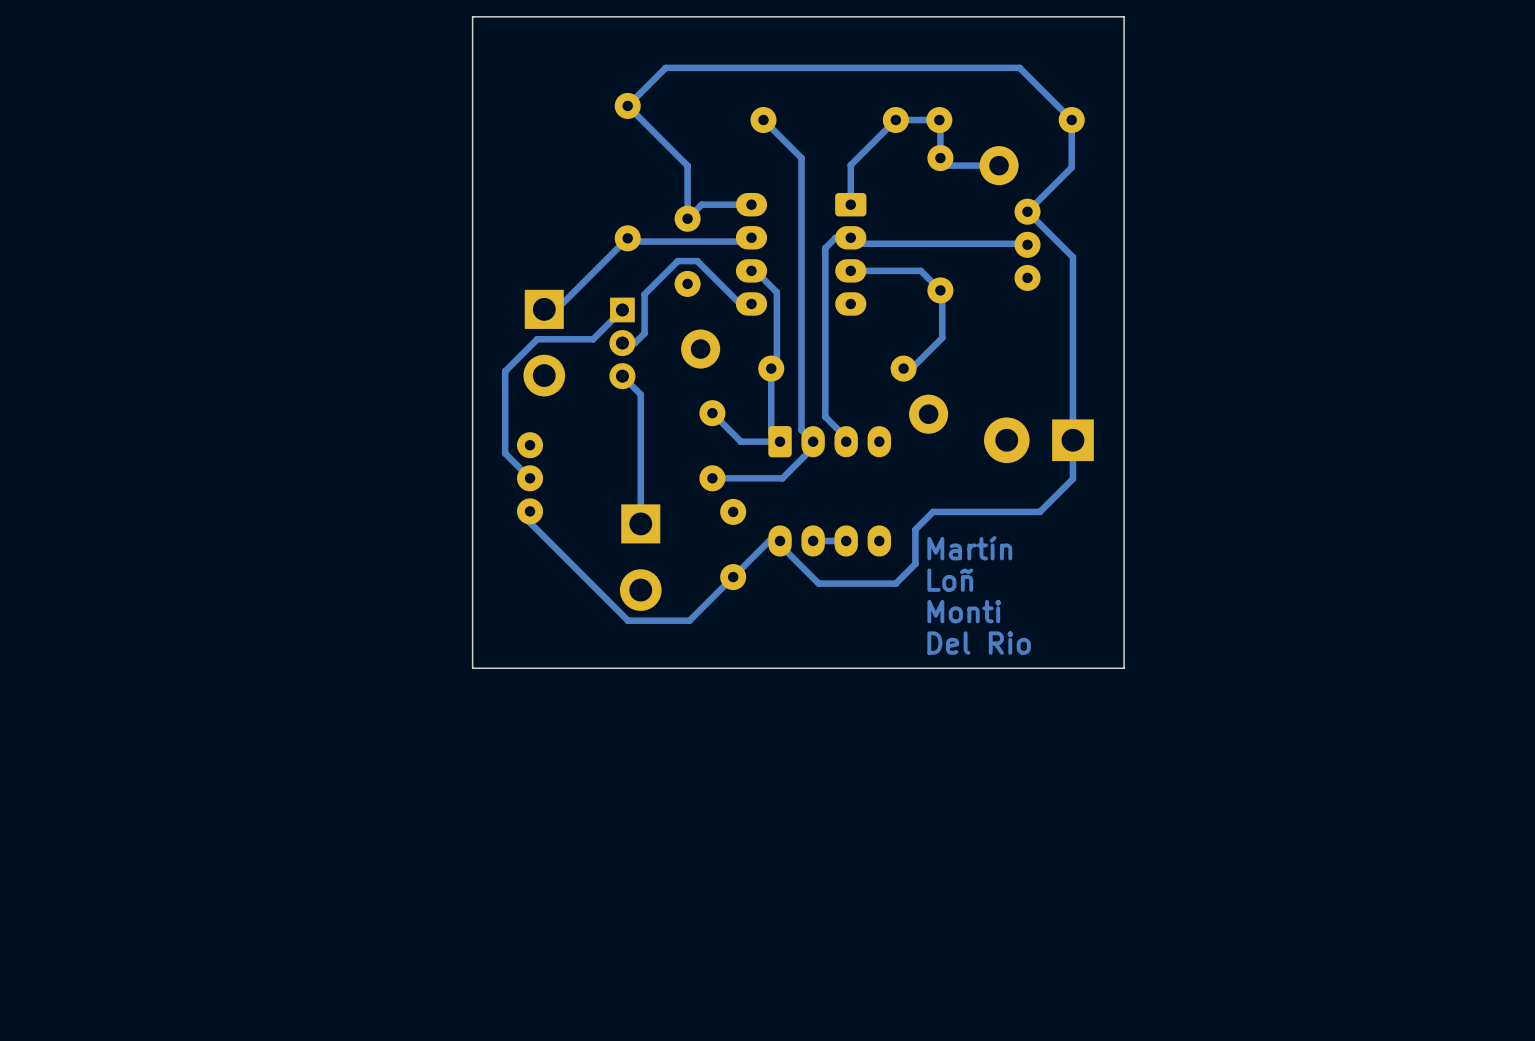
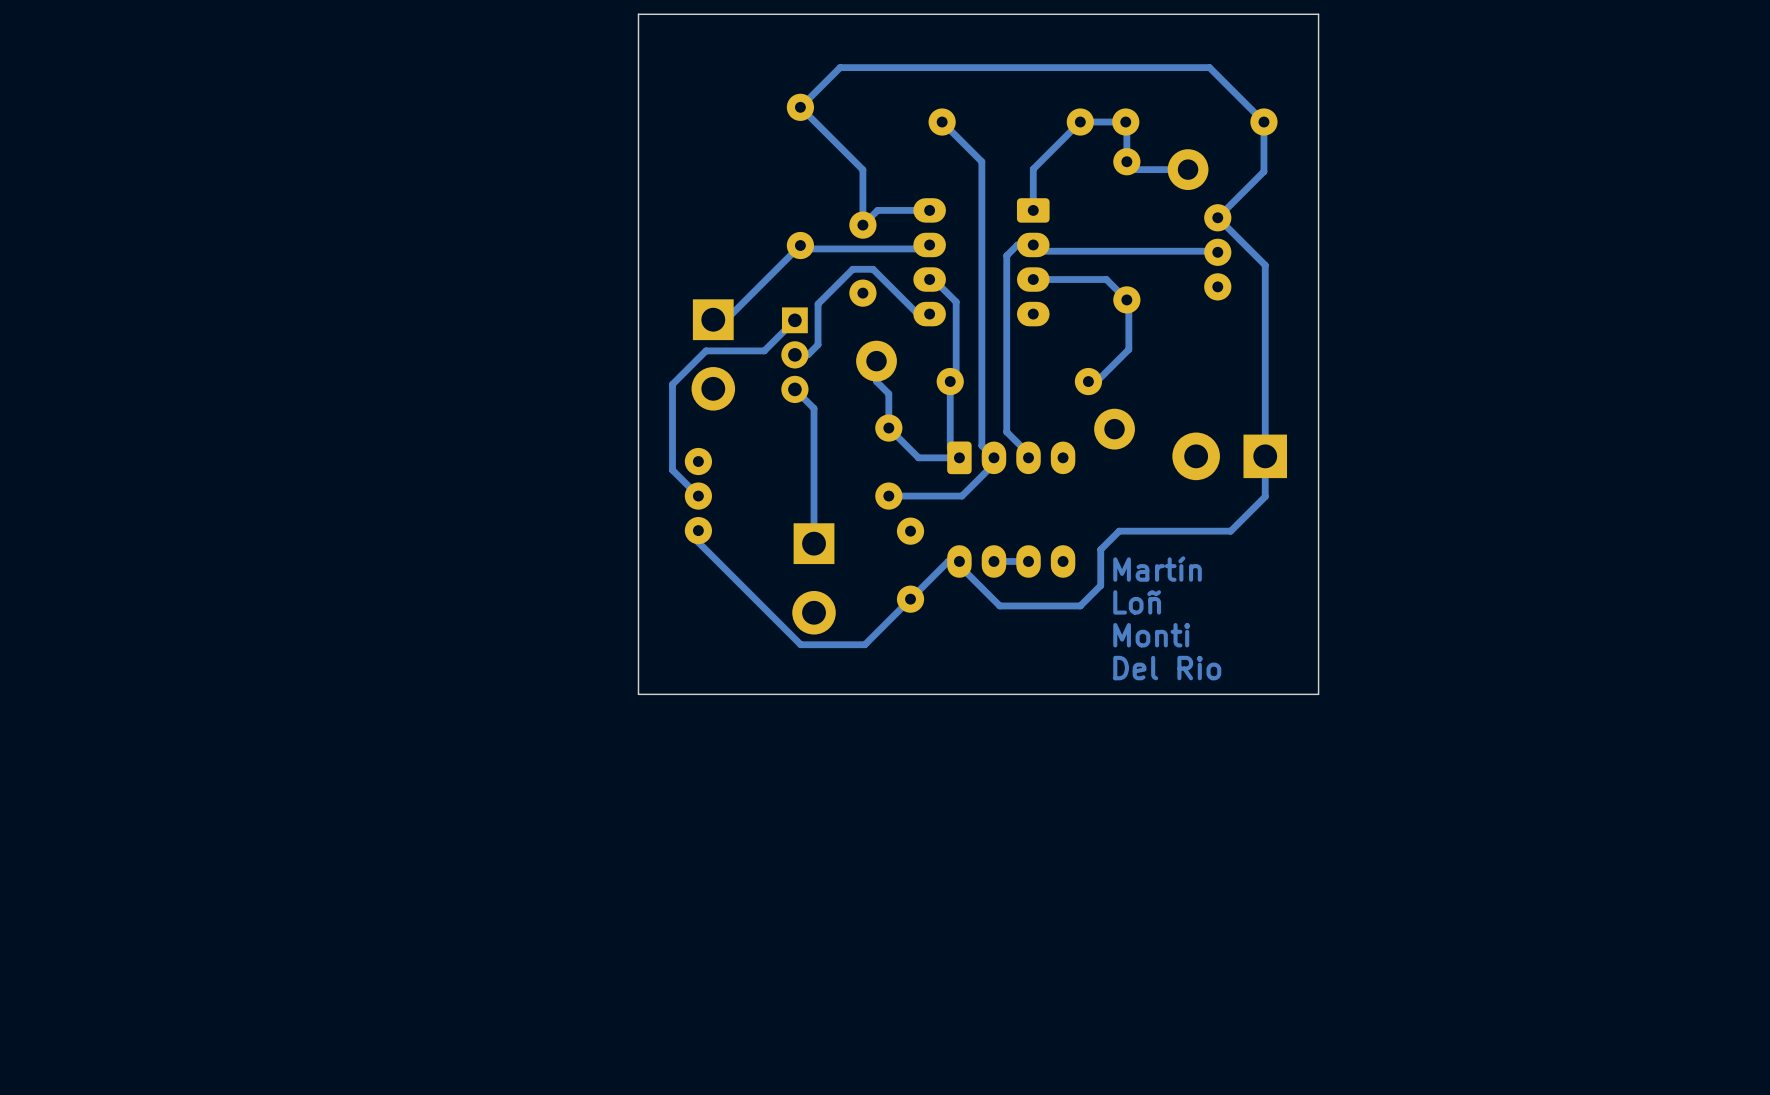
track: none -> (876, 361) (876, 381) (888, 393) (888, 428)

